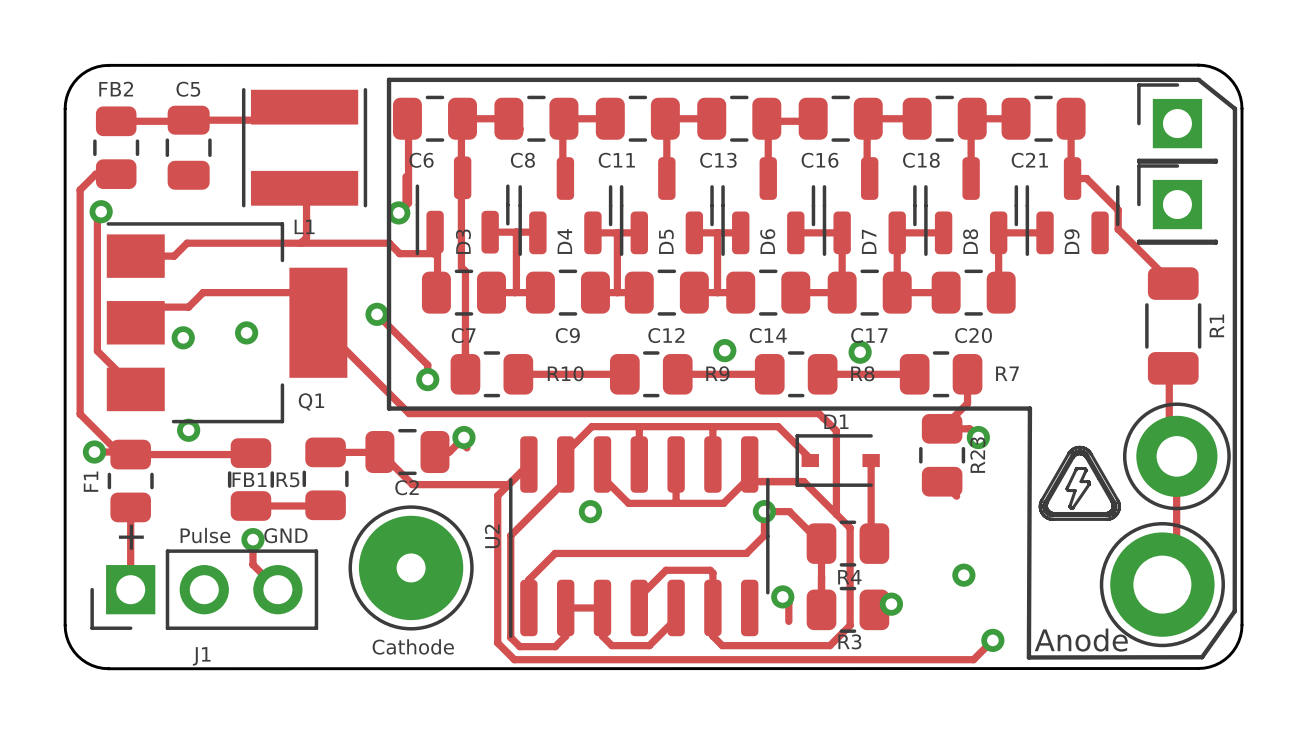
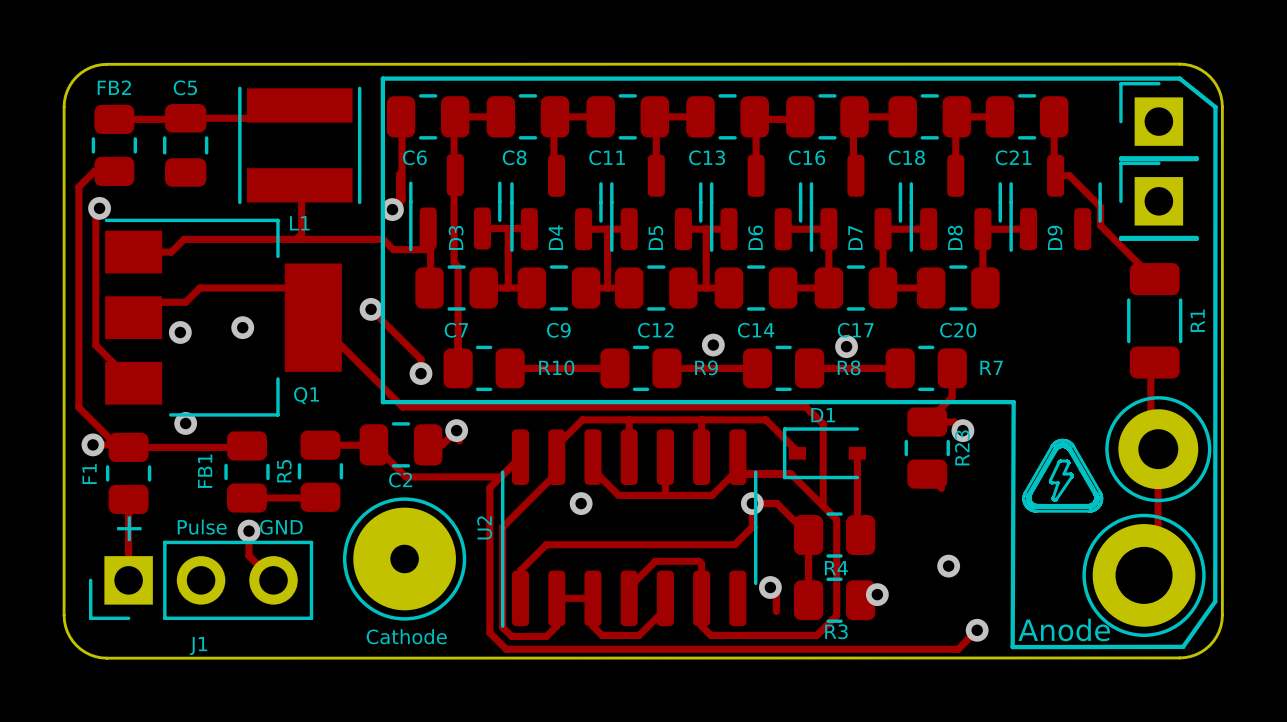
FB1 name rotation: 0° (249, 479) -> 90° counterclockwise (205, 471)
R5 name rotation: 0° (288, 479) -> 90° counterclockwise (284, 471)

